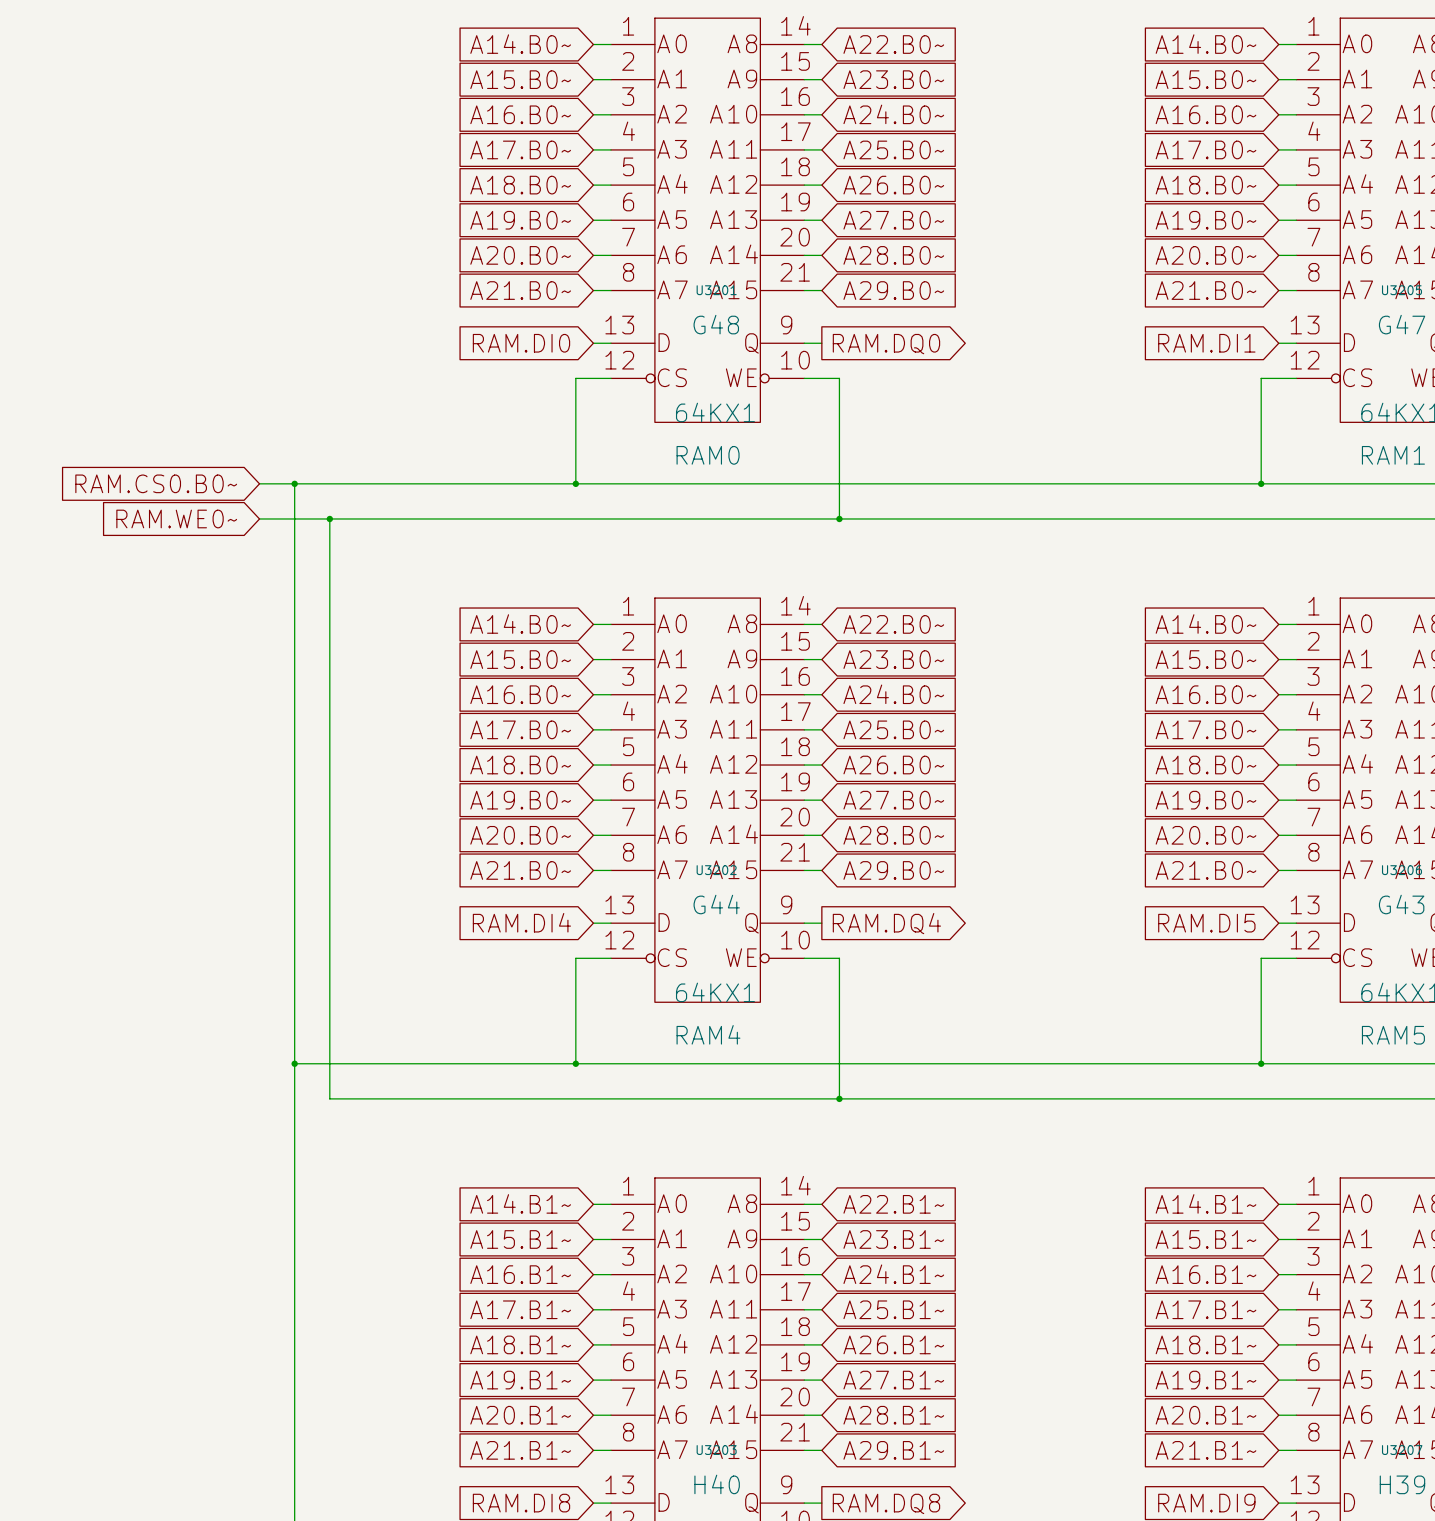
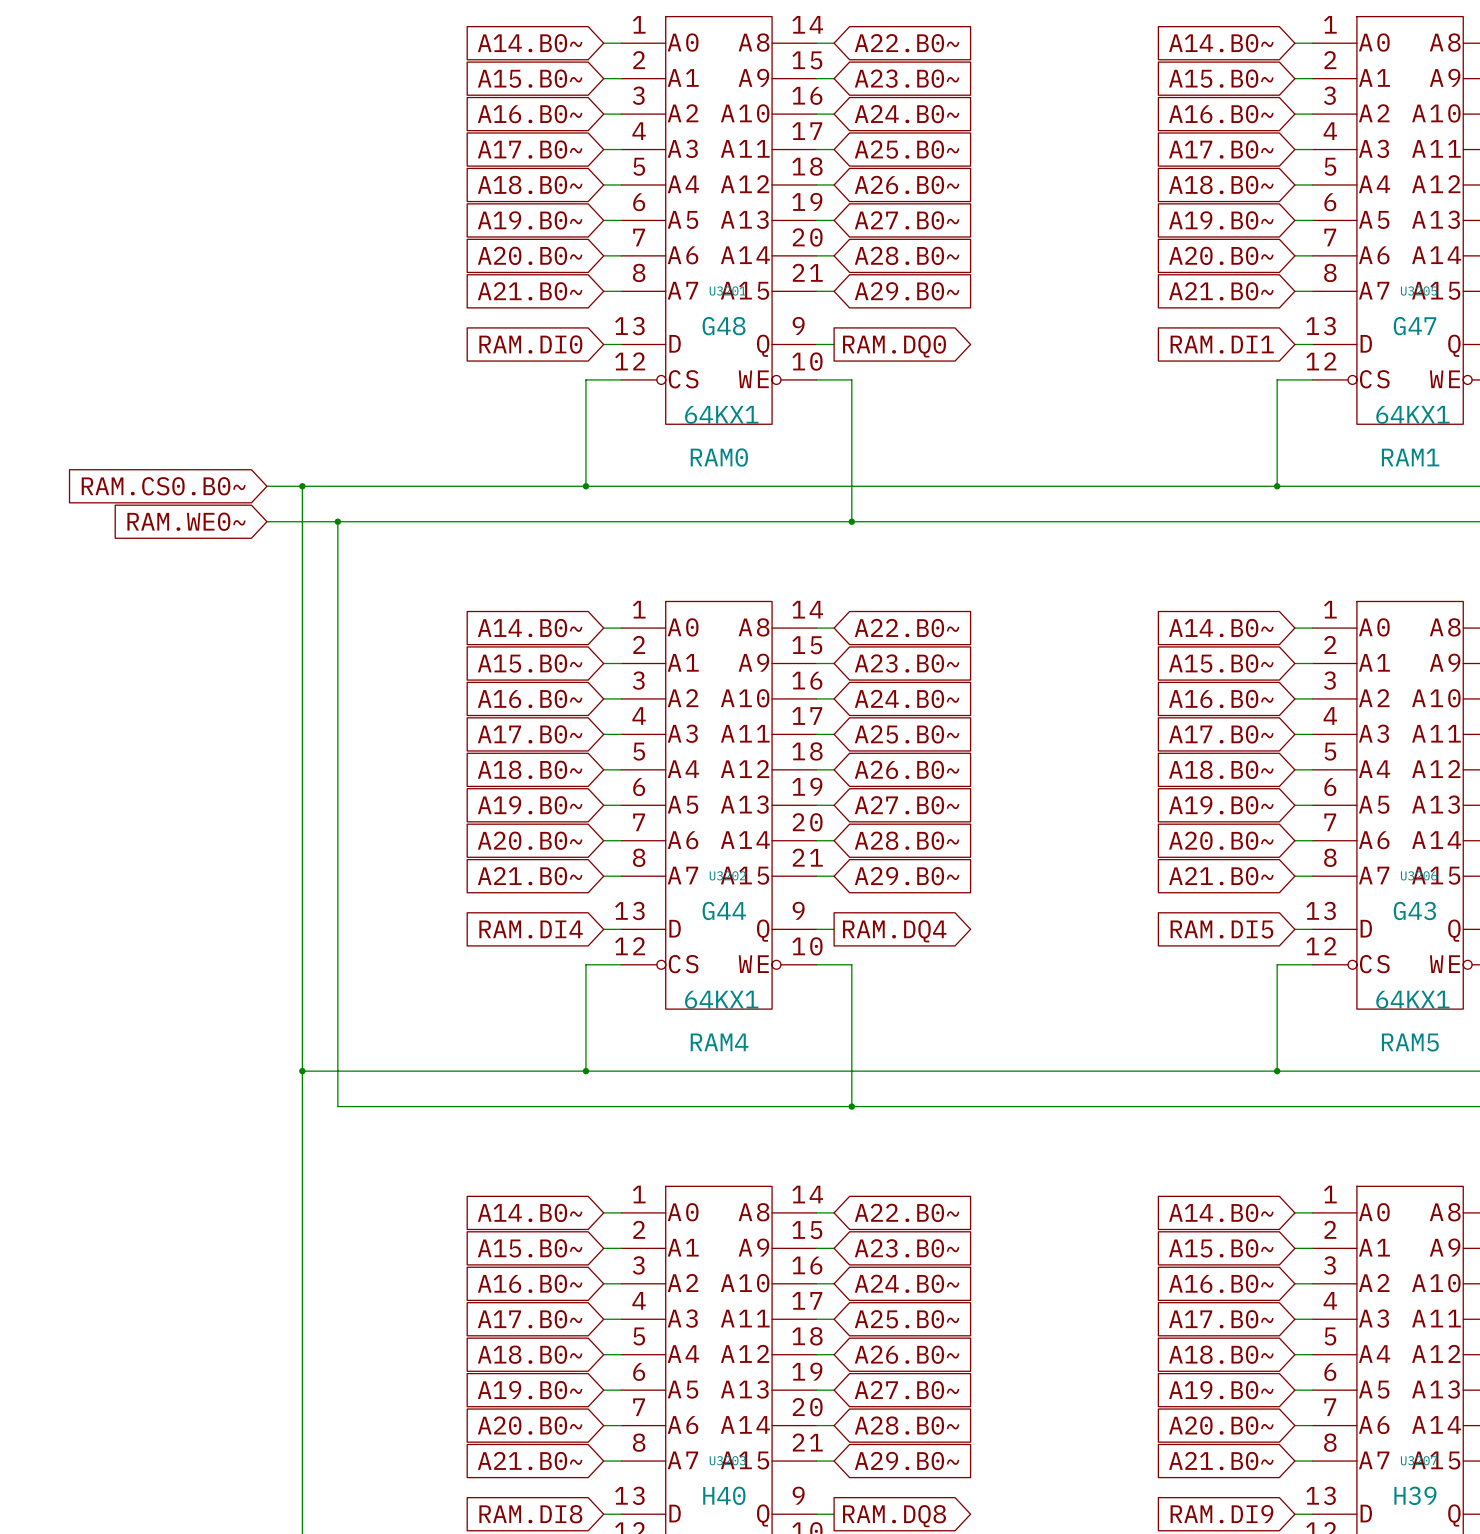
global label: A14.B1~ (520, 1203) -> A14.B0~ (530, 1212)
global label: A14.B1~ (1206, 1203) -> A14.B0~ (1221, 1212)
global label: A22.B1~ (893, 1204) -> A22.B0~ (907, 1212)
global label: A15.B1~ (520, 1239) -> A15.B0~ (530, 1248)
global label: A23.B1~ (893, 1239) -> A23.B0~ (907, 1248)
global label: A15.B1~ (1206, 1239) -> A15.B0~ (1221, 1248)
global label: A16.B1~ (520, 1274) -> A16.B0~ (530, 1283)
global label: A24.B1~ (893, 1274) -> A24.B0~ (907, 1283)
global label: A16.B1~ (1206, 1274) -> A16.B0~ (1221, 1283)
global label: A17.B1~ (520, 1309) -> A17.B0~ (530, 1319)
global label: A25.B1~ (893, 1309) -> A25.B0~ (907, 1319)
global label: A17.B1~ (1206, 1309) -> A17.B0~ (1221, 1319)
global label: A18.B1~ (520, 1344) -> A18.B0~ (530, 1354)
global label: A26.B1~ (893, 1344) -> A26.B0~ (907, 1354)
global label: A18.B1~ (1206, 1344) -> A18.B0~ (1221, 1354)
global label: A19.B1~ (520, 1380) -> A19.B0~ (530, 1390)
global label: A27.B1~ (893, 1380) -> A27.B0~ (907, 1390)
global label: A19.B1~ (1206, 1380) -> A19.B0~ (1221, 1390)
global label: A20.B1~ (520, 1415) -> A20.B0~ (530, 1425)
global label: A28.B1~ (893, 1415) -> A28.B0~ (907, 1425)
global label: A20.B1~ (1206, 1415) -> A20.B0~ (1221, 1425)
global label: A21.B1~ (520, 1450) -> A21.B0~ (530, 1461)
global label: A29.B1~ (893, 1450) -> A29.B0~ (907, 1461)
global label: A21.B1~ (1206, 1450) -> A21.B0~ (1221, 1461)

